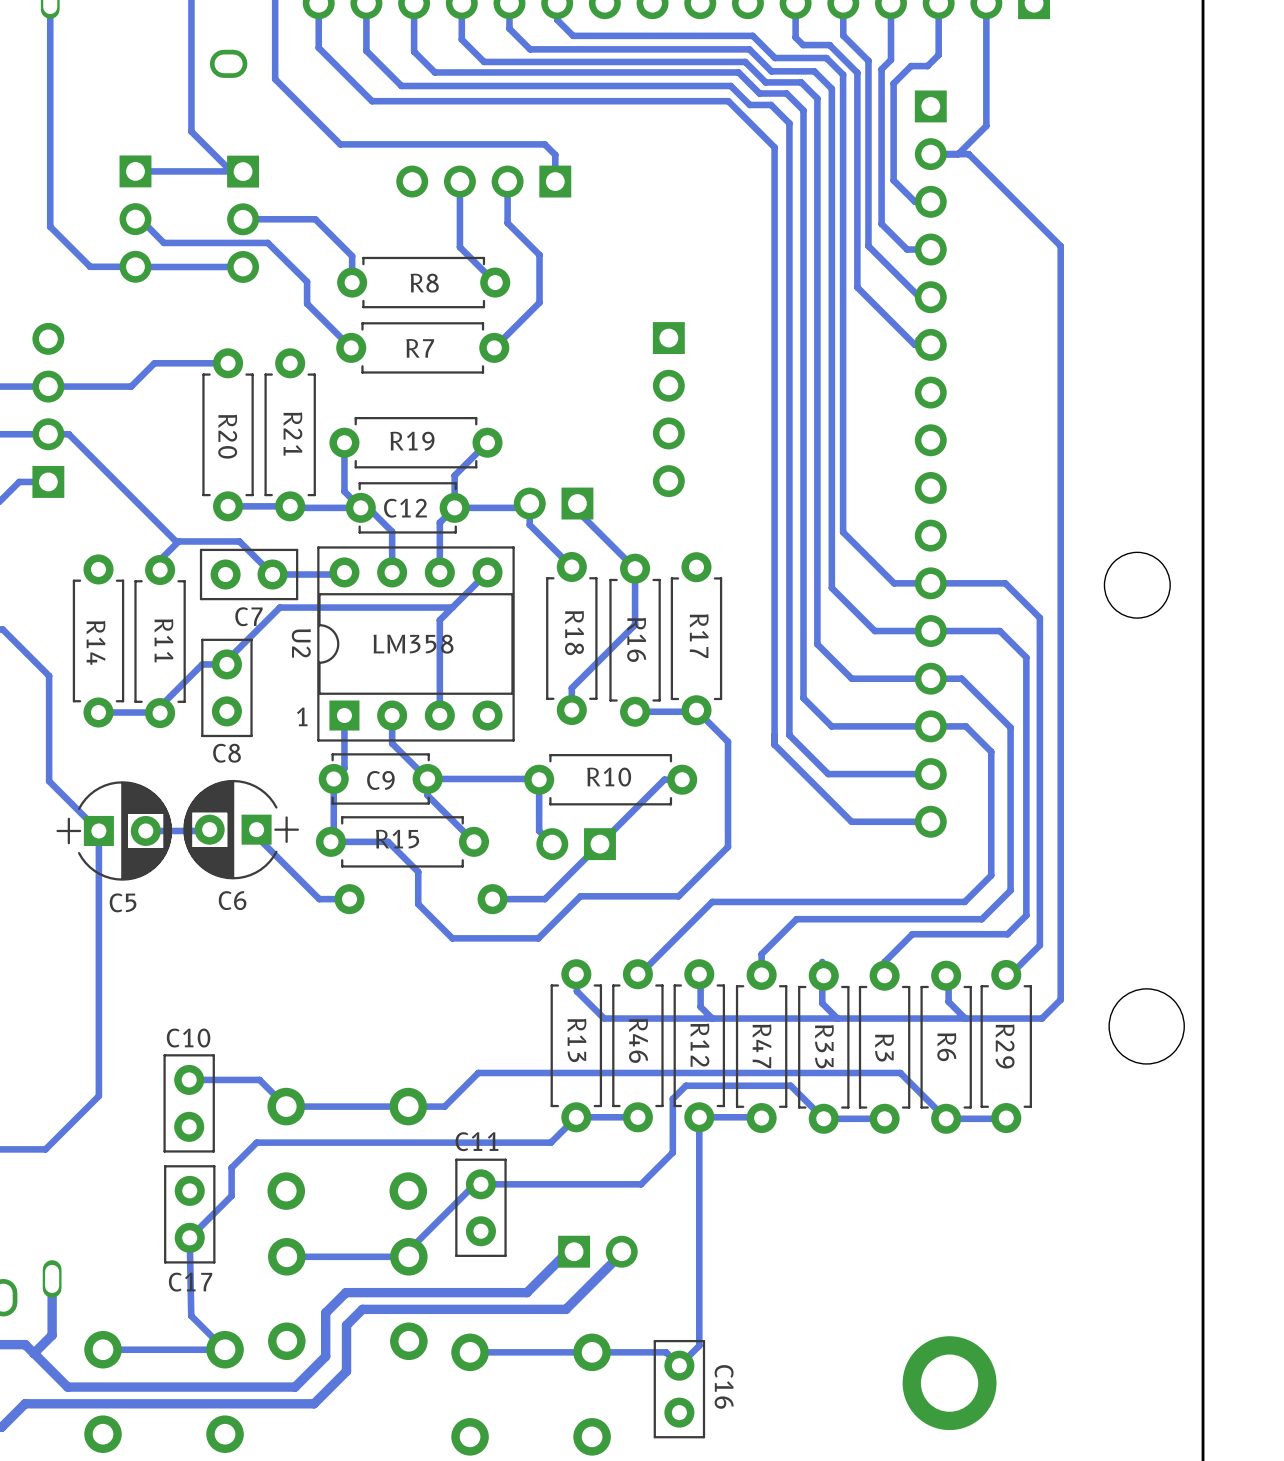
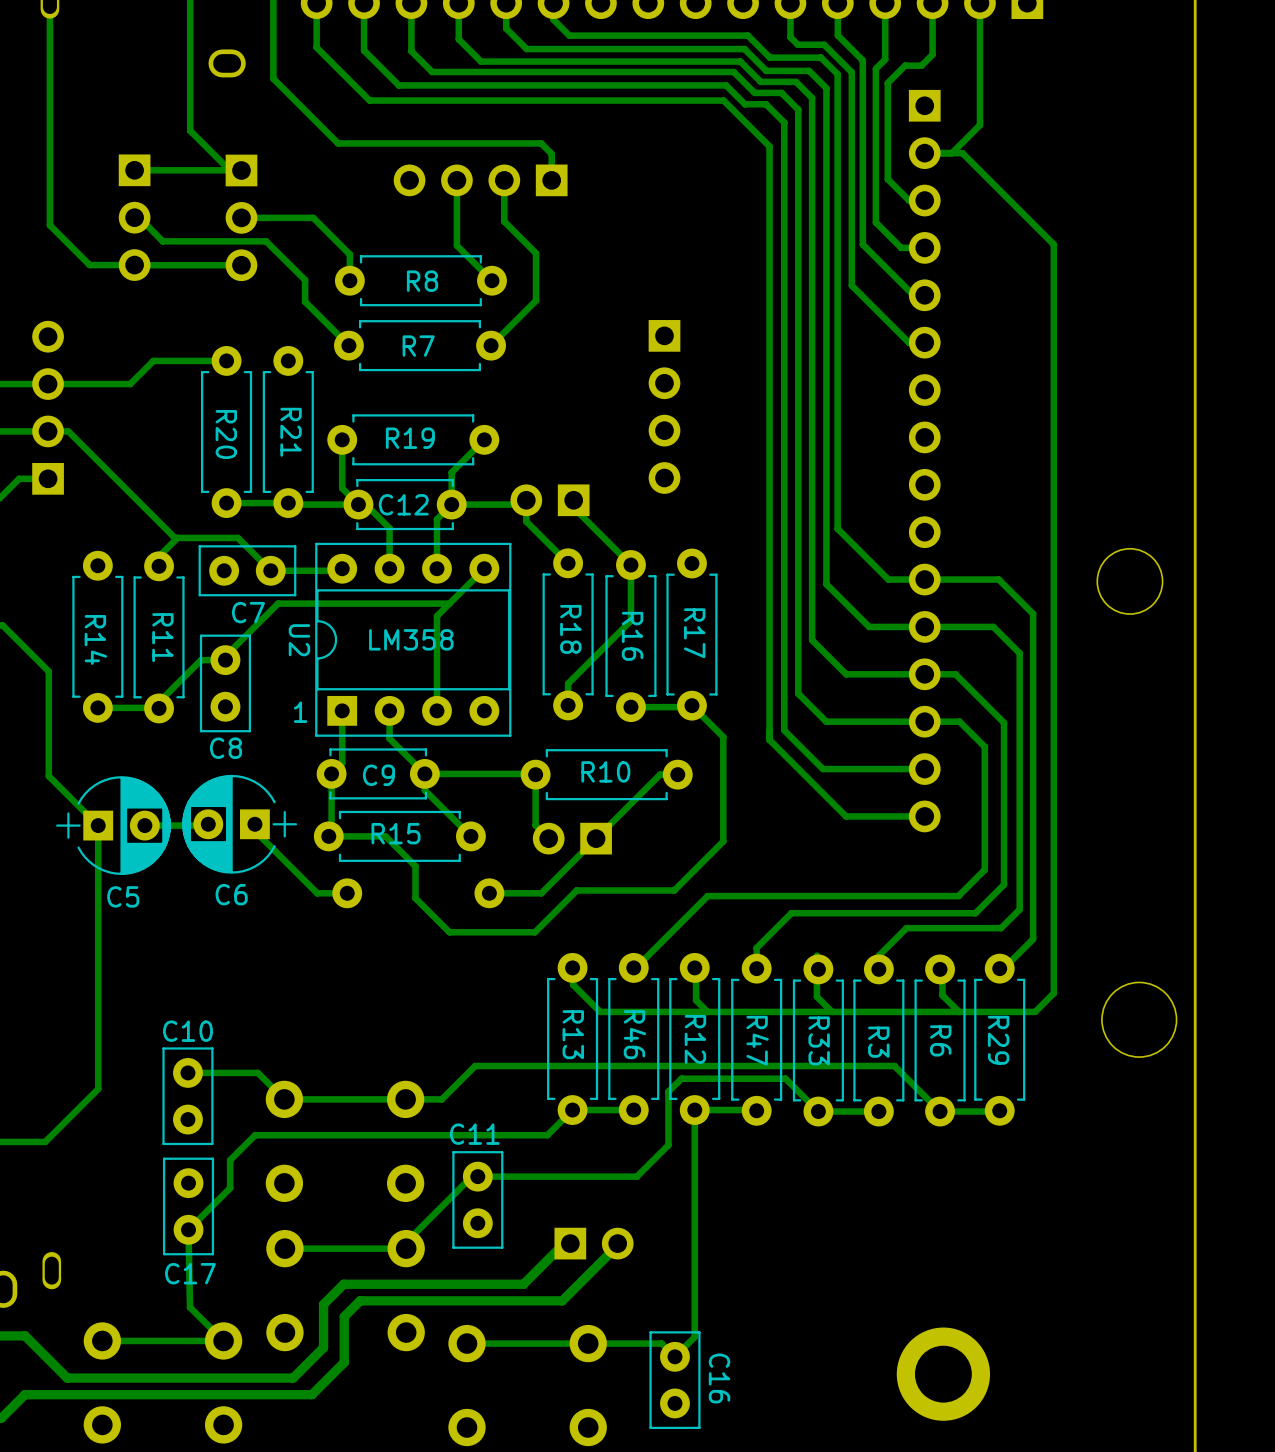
track: (52, 1278) (52, 1335) (34, 1353) -> none

